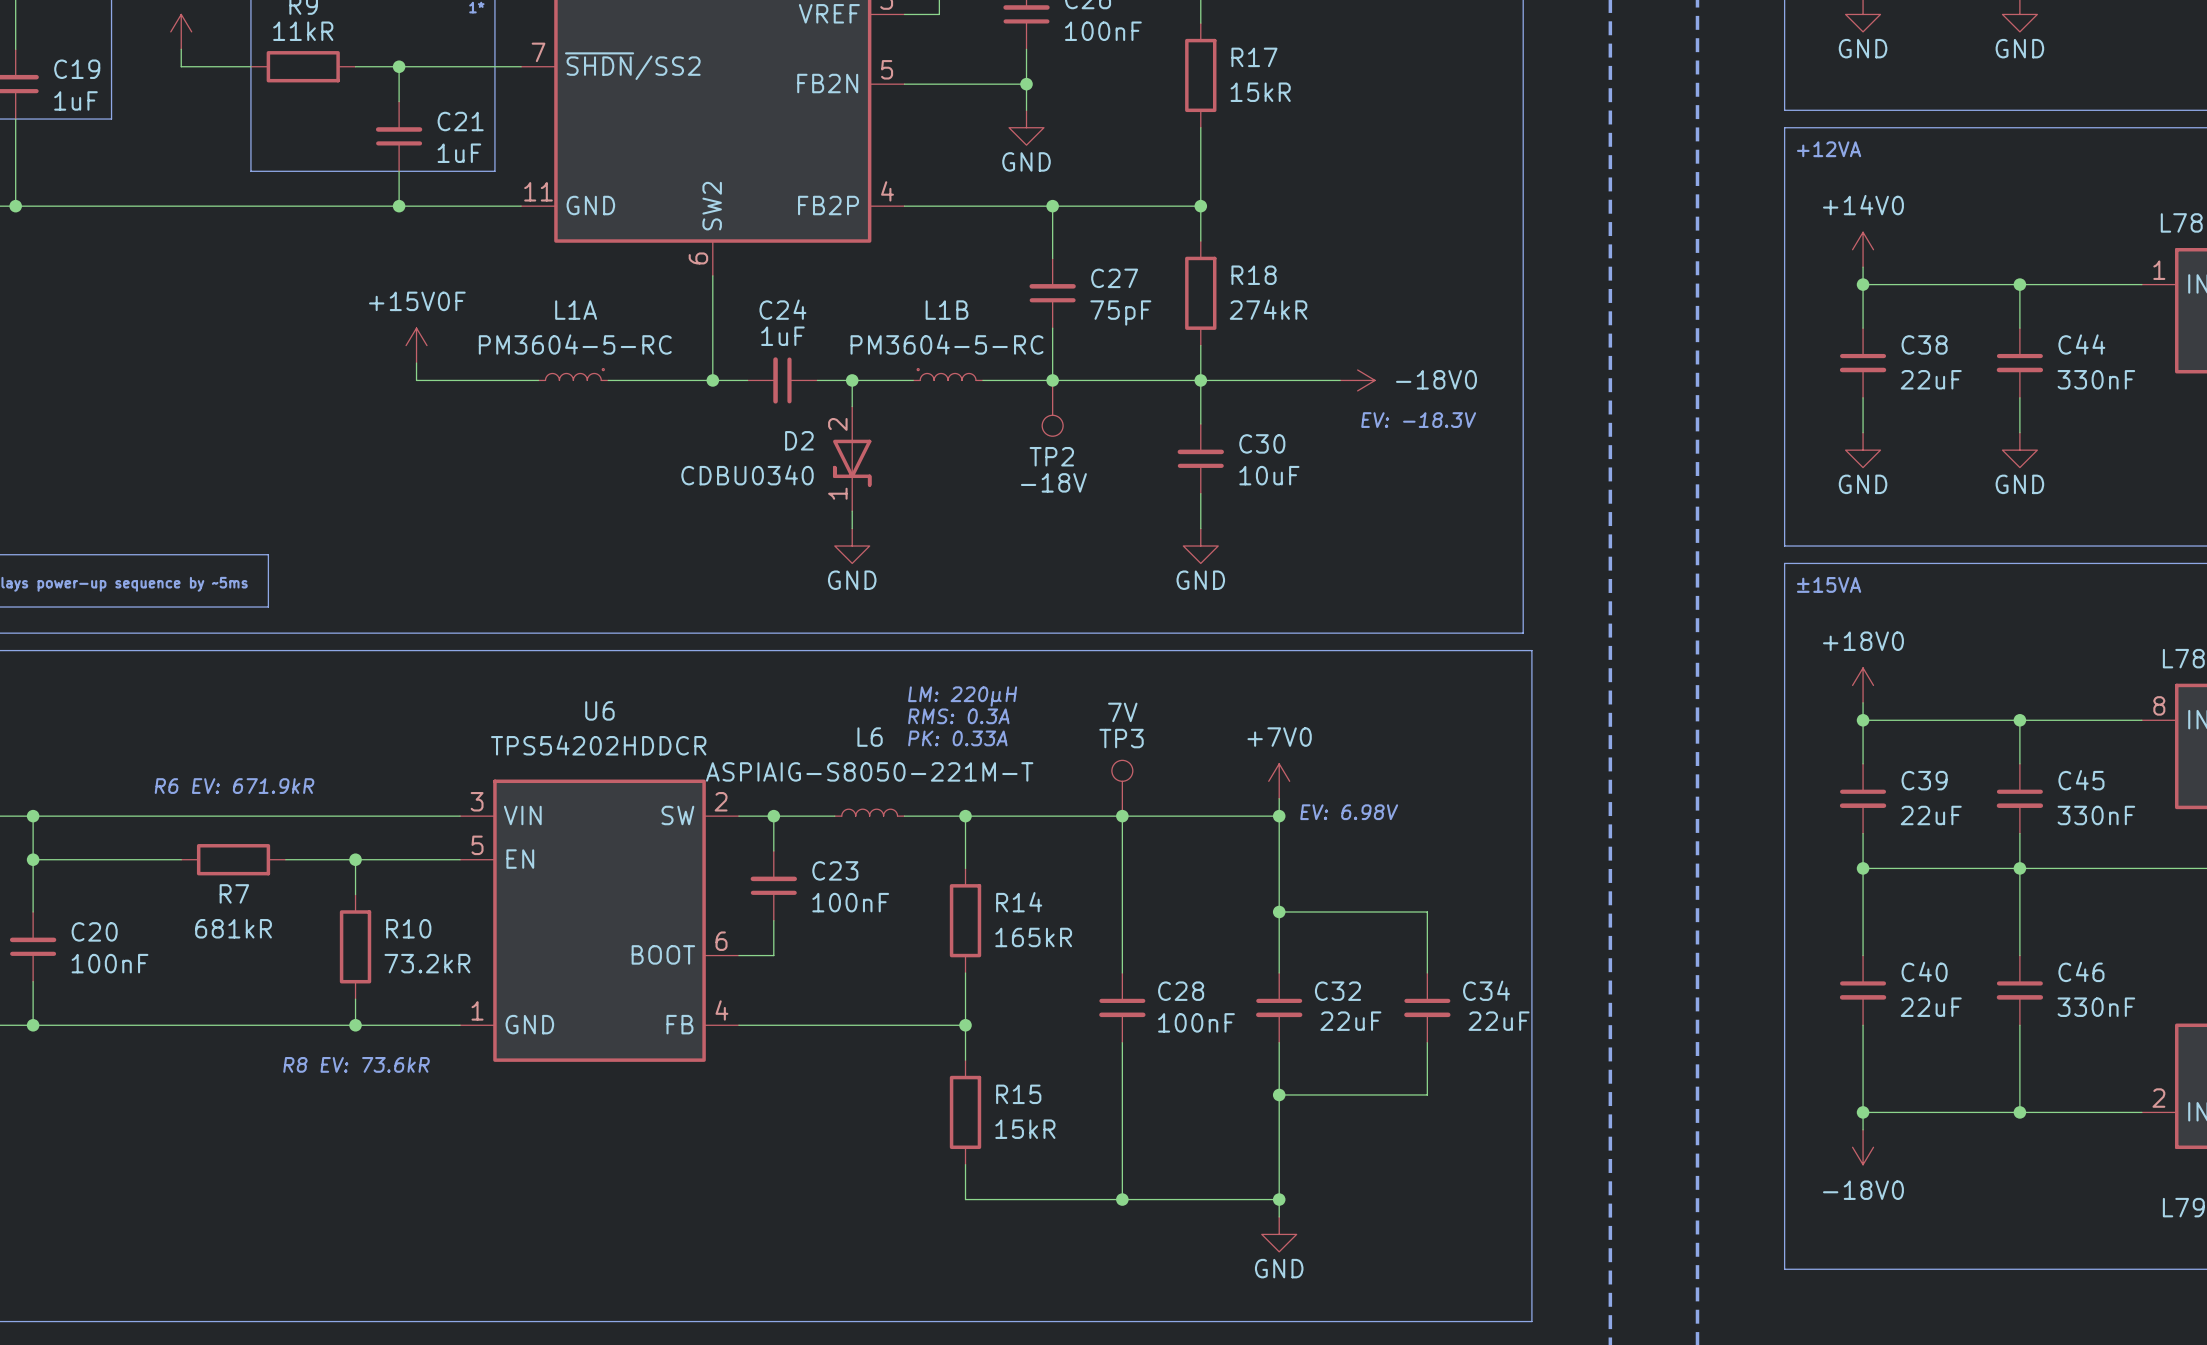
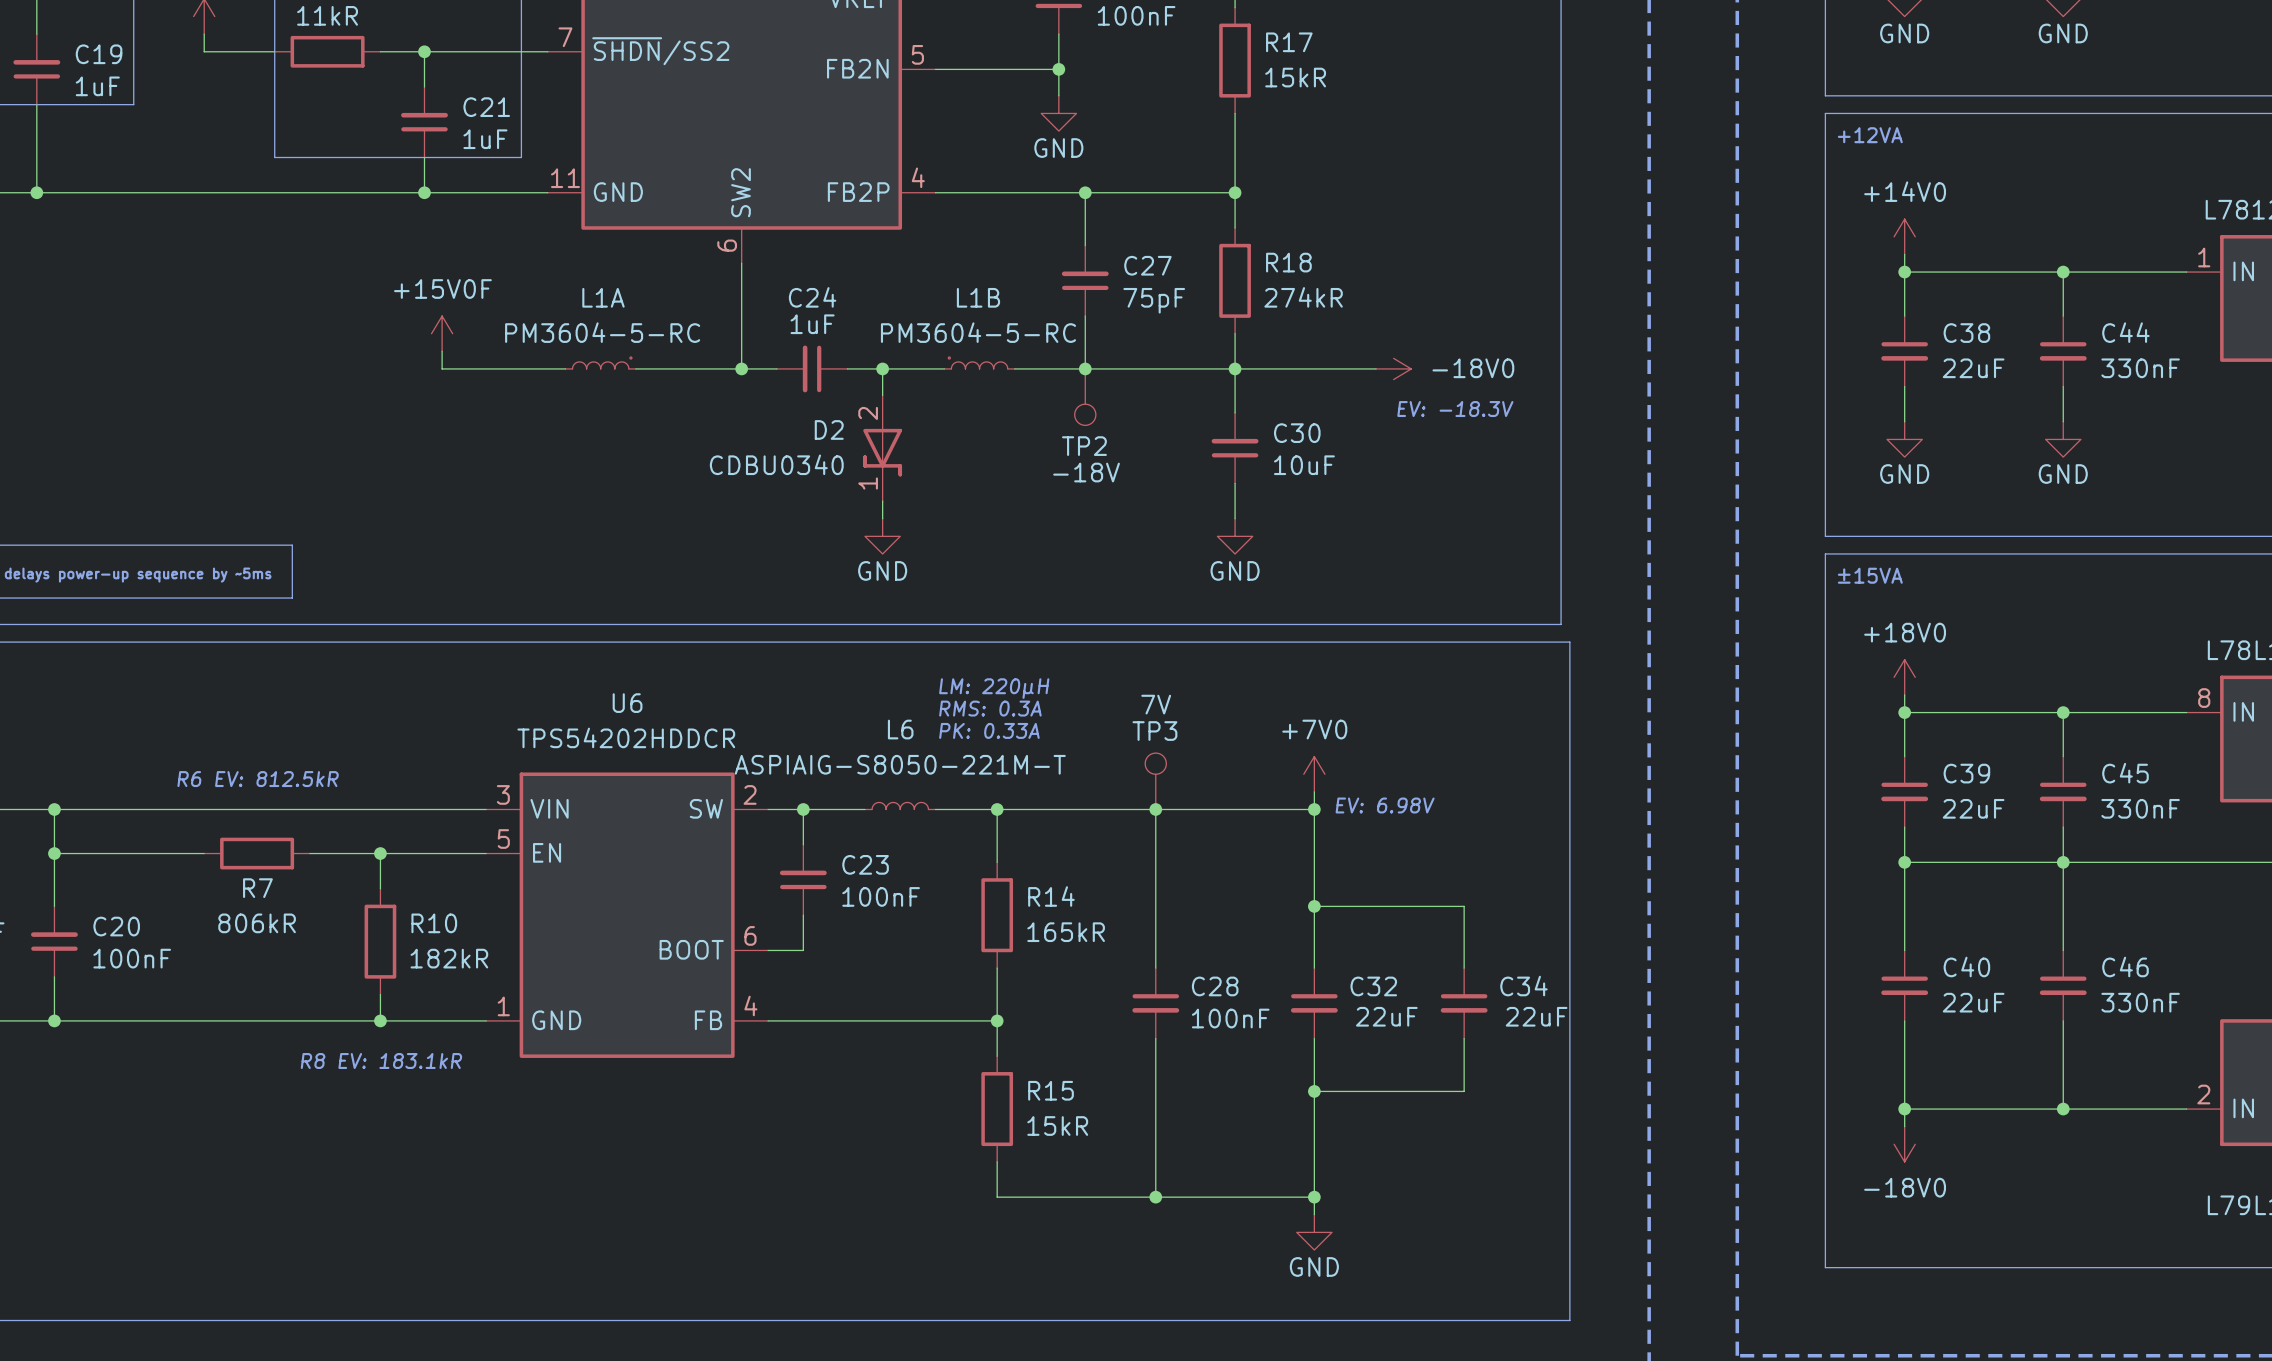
text: R6 EV: 671.9kR (234, 786) -> R6 EV: 812.5kR (258, 779)
R7 value: 681kR (233, 928) -> 806kR (257, 923)
R10 value: 73.2kR (427, 963) -> 182kR (449, 958)
text: R8 EV: 73.6kR (356, 1064) -> R8 EV: 183.1kR (381, 1061)

